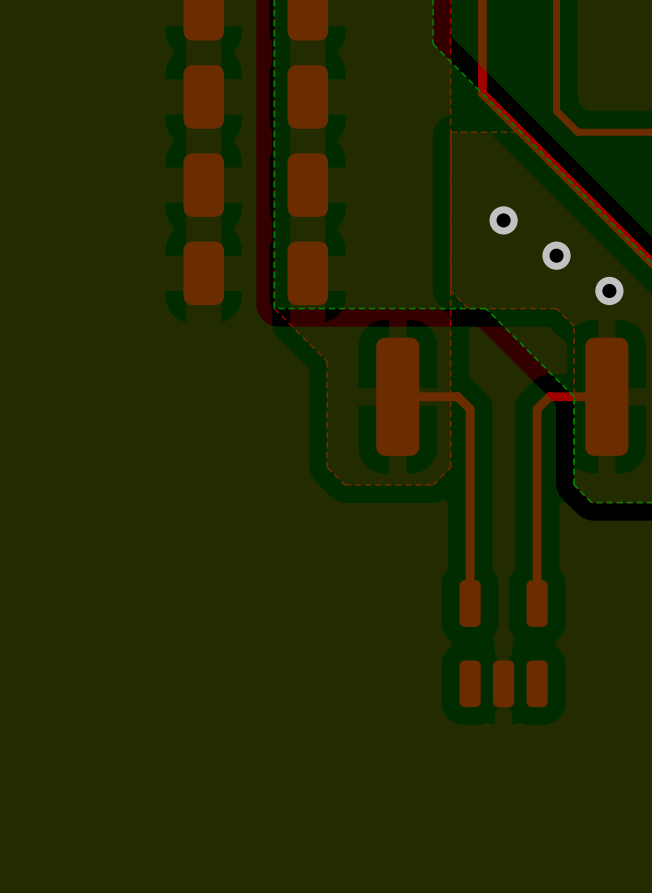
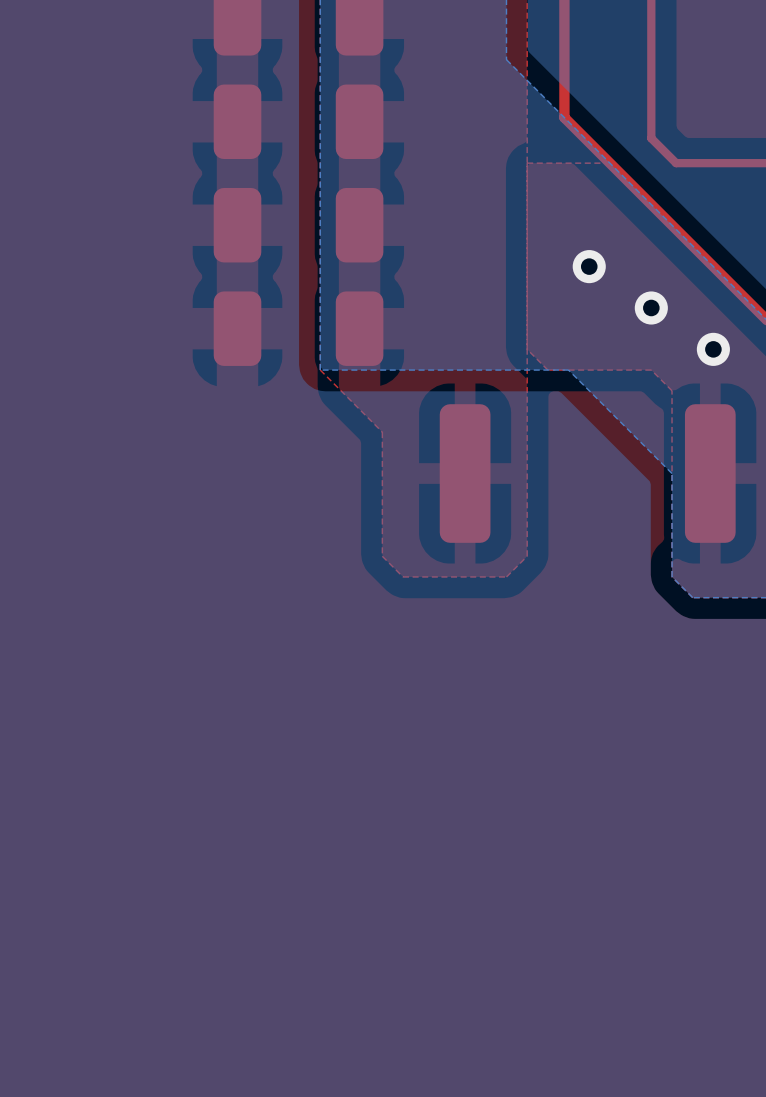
top track: (397, 396) (457, 396) (470, 409) (470, 603) -> none
top track: (606, 396) (549, 396) (537, 409) (537, 603) -> none
part: (503, 643) -> none

